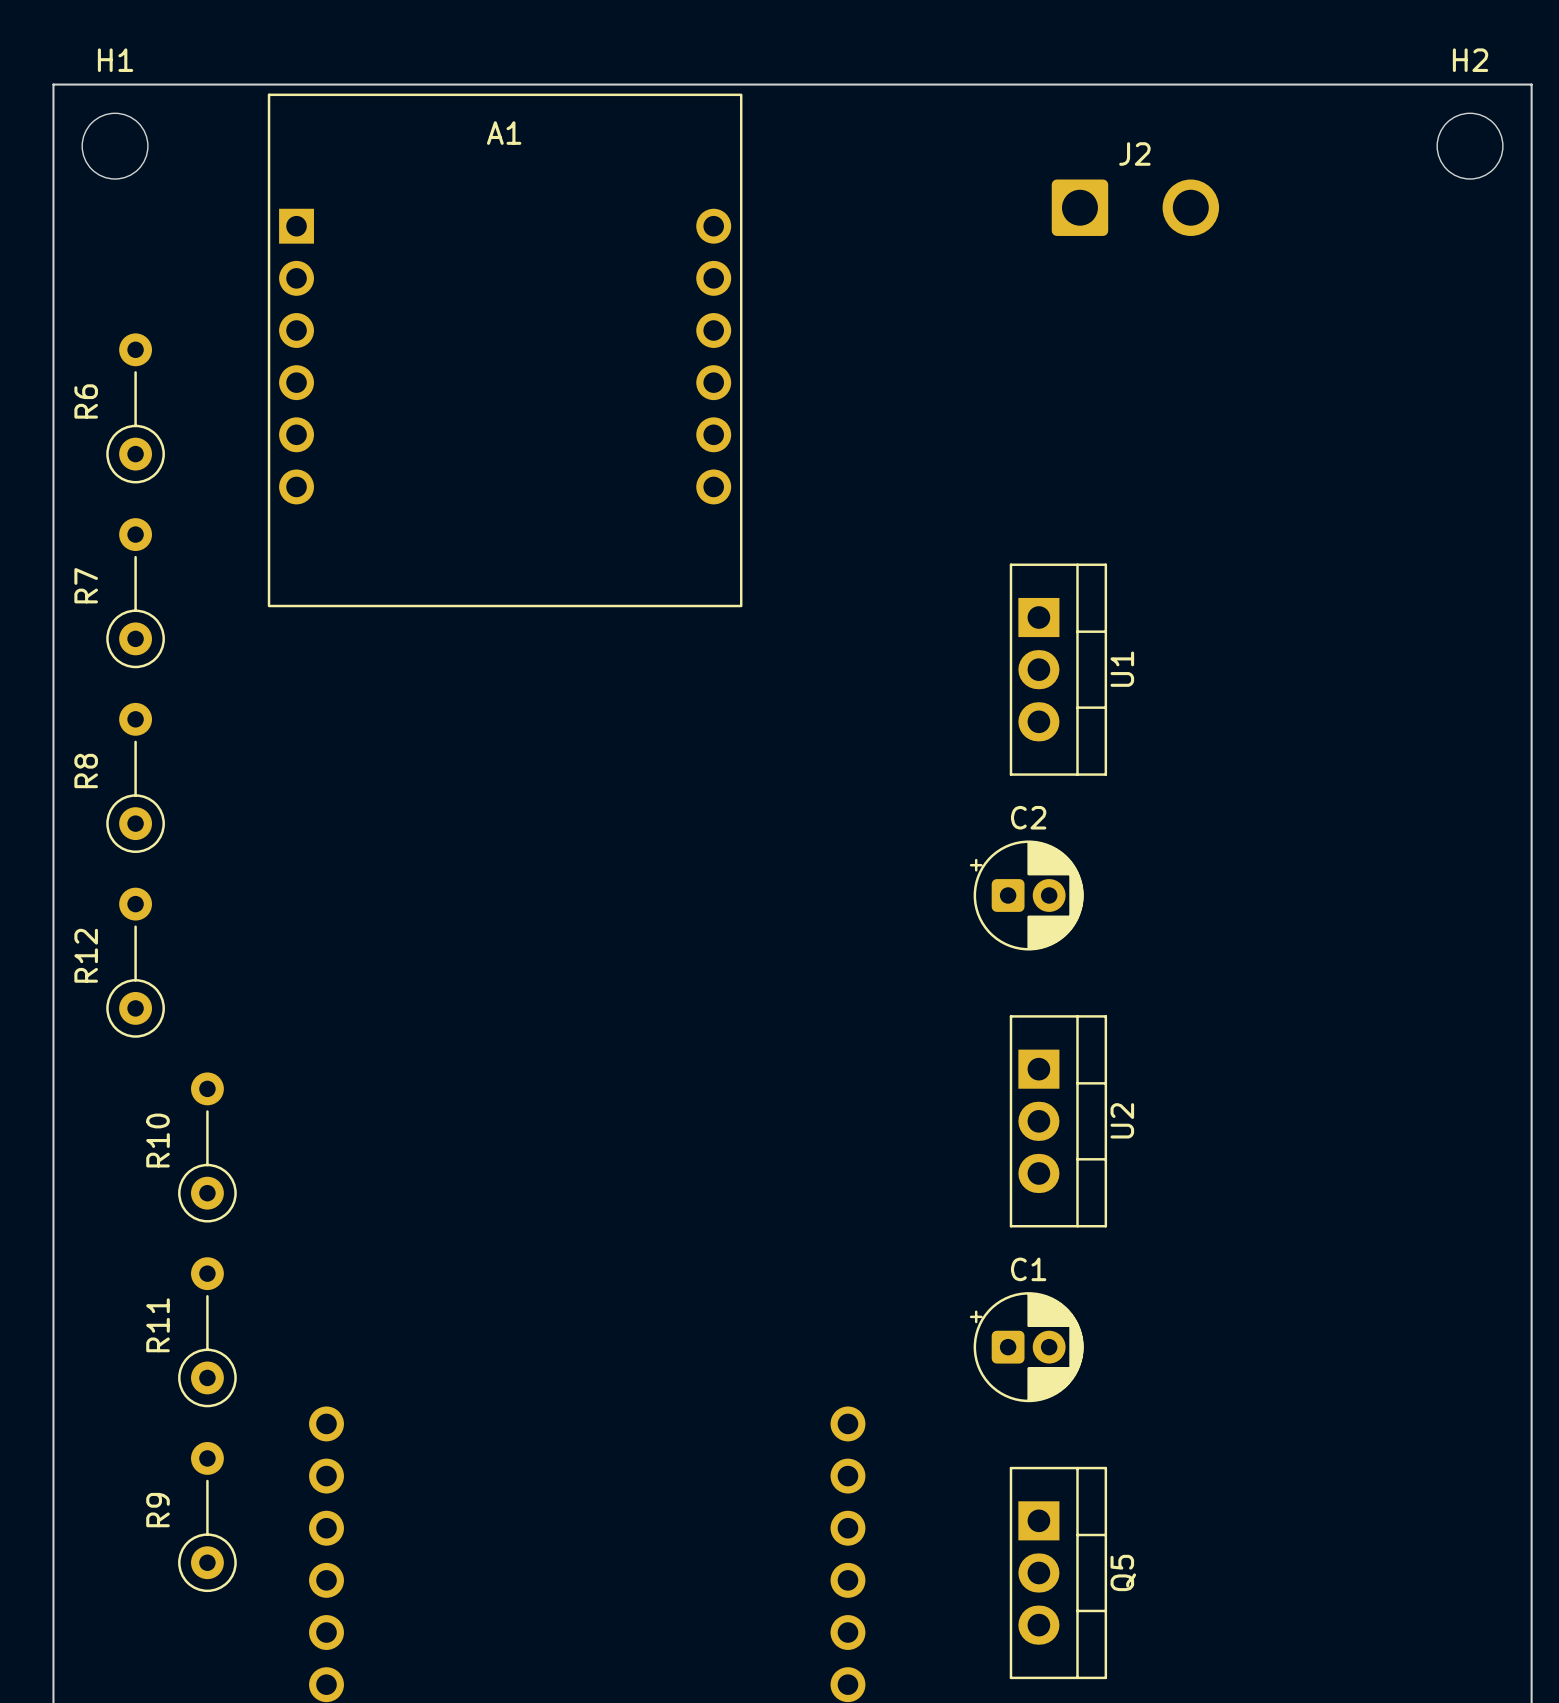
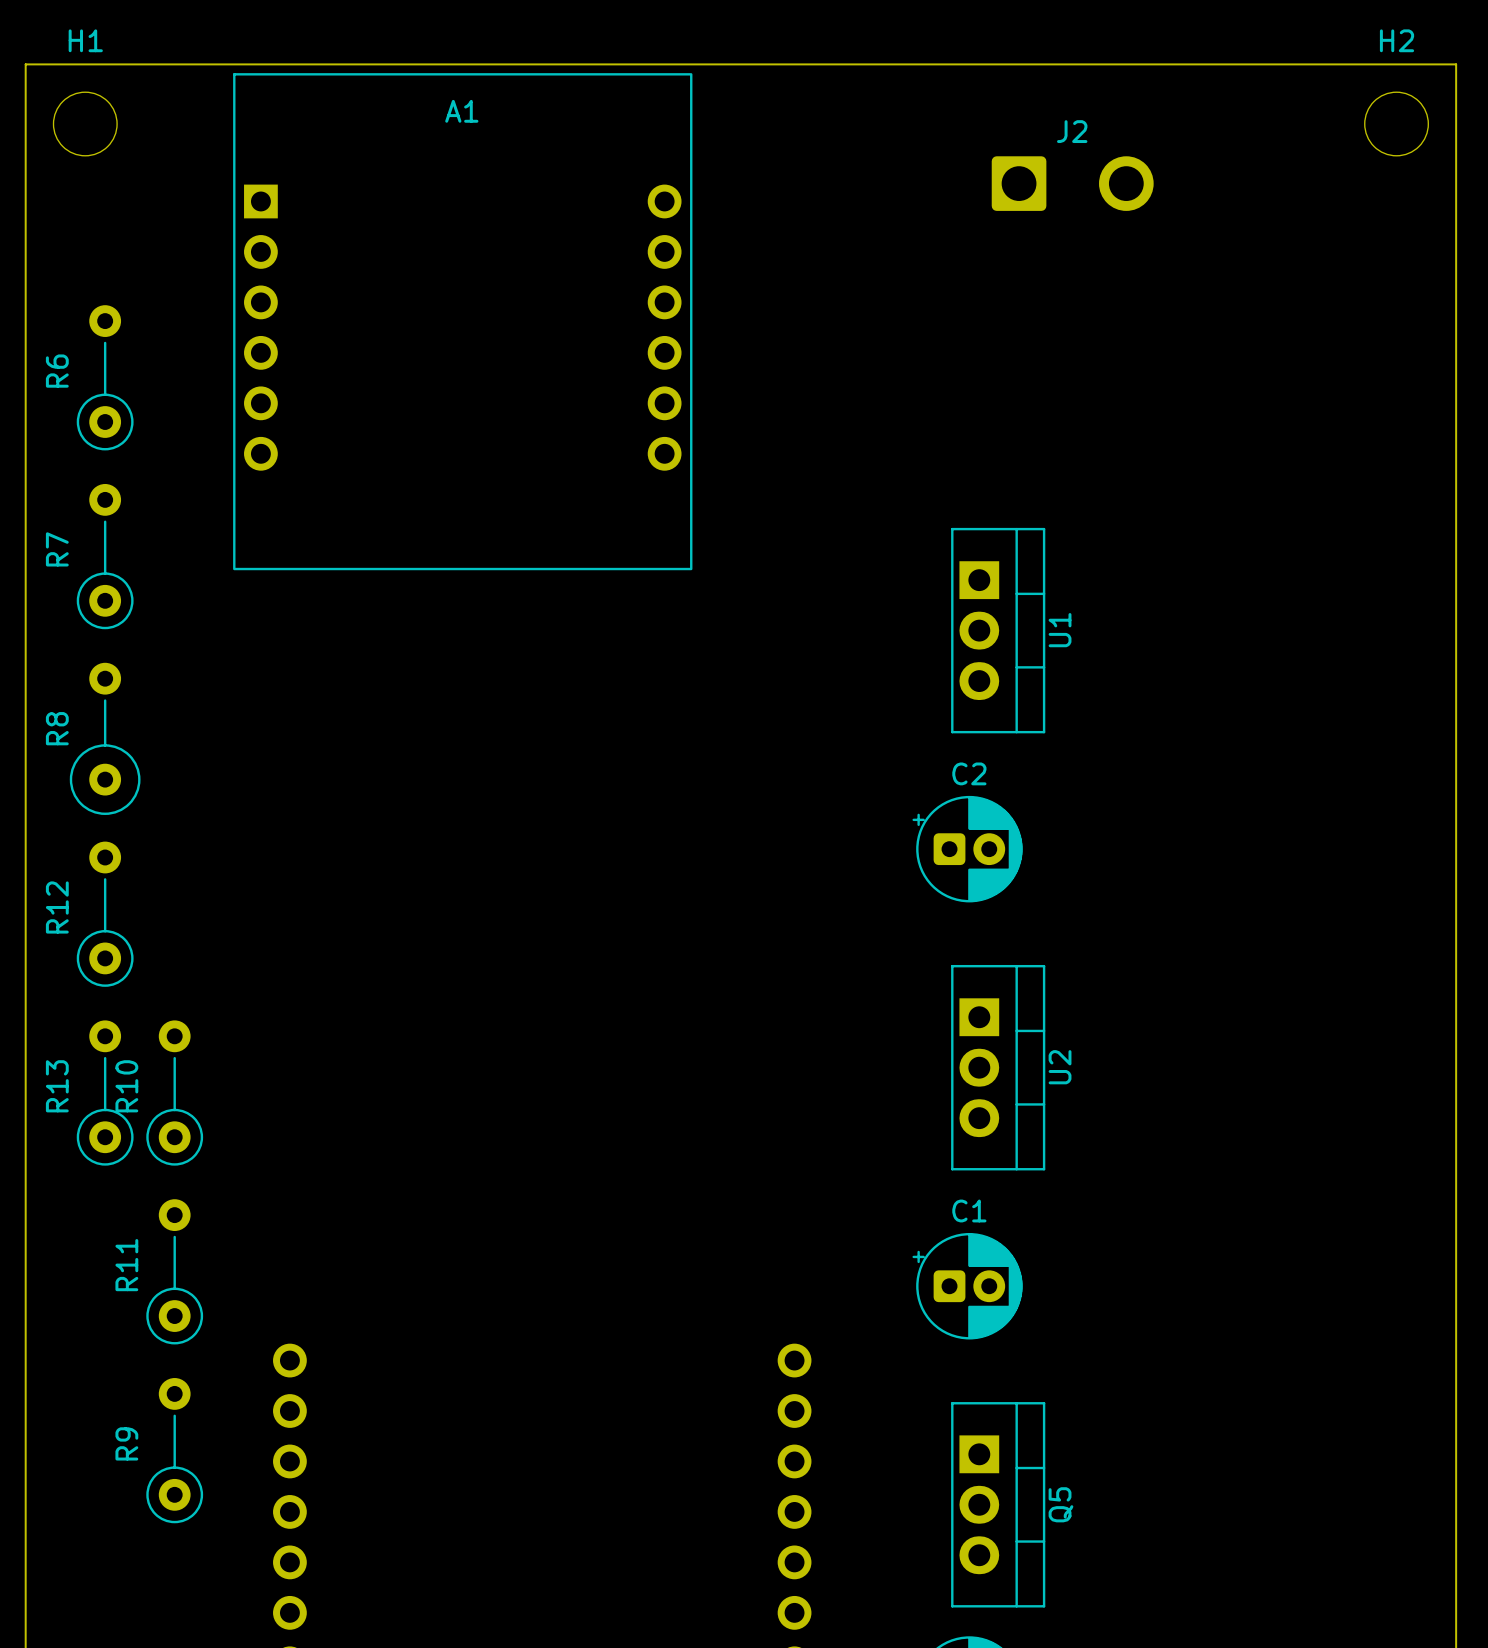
R8 footprint: [106, 702, 165, 853] -> [69, 662, 141, 815]
R13: none -> (105, 1093)

